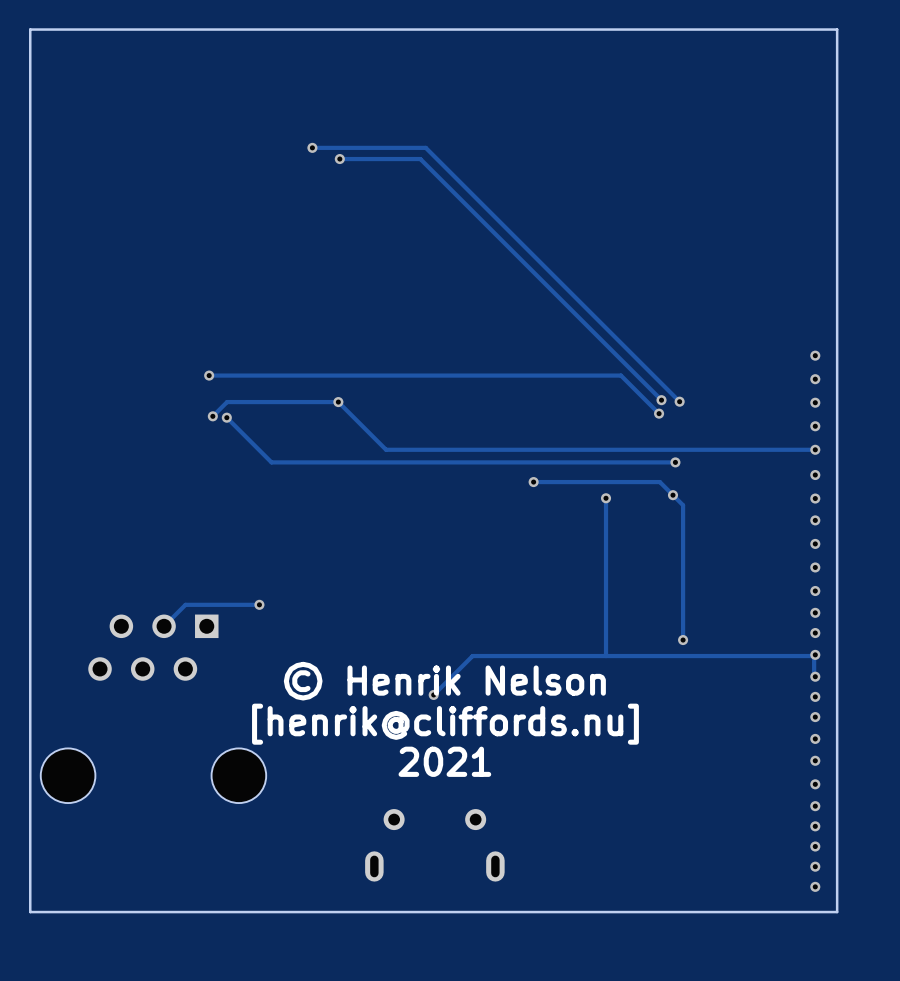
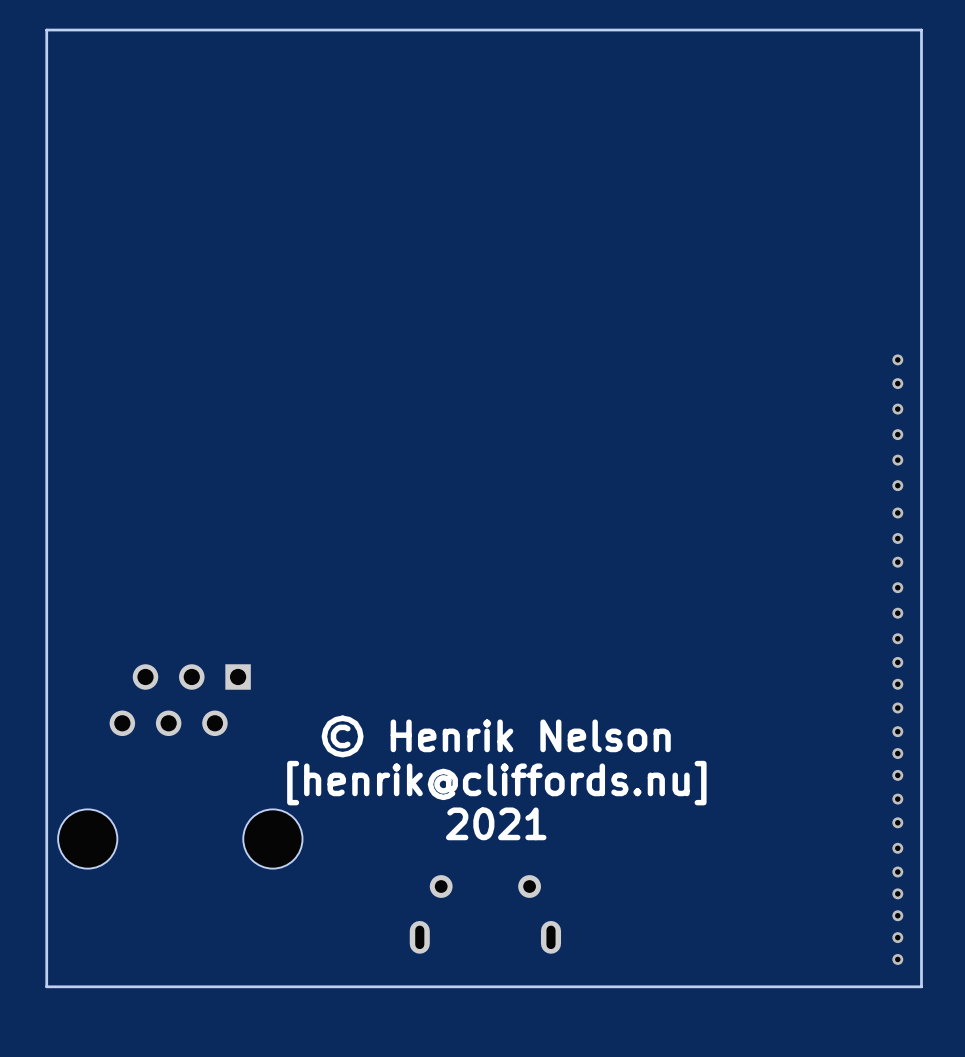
track: (312, 147) (425, 147) (679, 401) -> none
via: (312, 147) -> none
track: (339, 159) (420, 159) (661, 400) -> none
via: (339, 159) -> none
via: none -> (897, 359)
track: (209, 375) (621, 375) (659, 413) -> none
via: (209, 375) -> none
via: (661, 400) -> none
via: (679, 401) -> none
via: (338, 402) -> none
via: (659, 413) -> none
track: (212, 416) (227, 402) (338, 402) (386, 449) (815, 449) -> none
via: (212, 416) -> none
track: (226, 417) (271, 462) (675, 462) -> none
via: (226, 417) -> none
via: (675, 462) -> none
track: (533, 482) (659, 482) (683, 505) (683, 640) -> none
via: (533, 482) -> none
via: (672, 495) -> none
track: (606, 498) (606, 656) -> none
via: (606, 498) -> none
track: (259, 604) (185, 604) (164, 626) -> none
via: (259, 604) -> none
via: (683, 640) -> none
track: (814, 656) (472, 656) (433, 694) -> none
track: (814, 656) (815, 676) -> none
via: (433, 694) -> none

